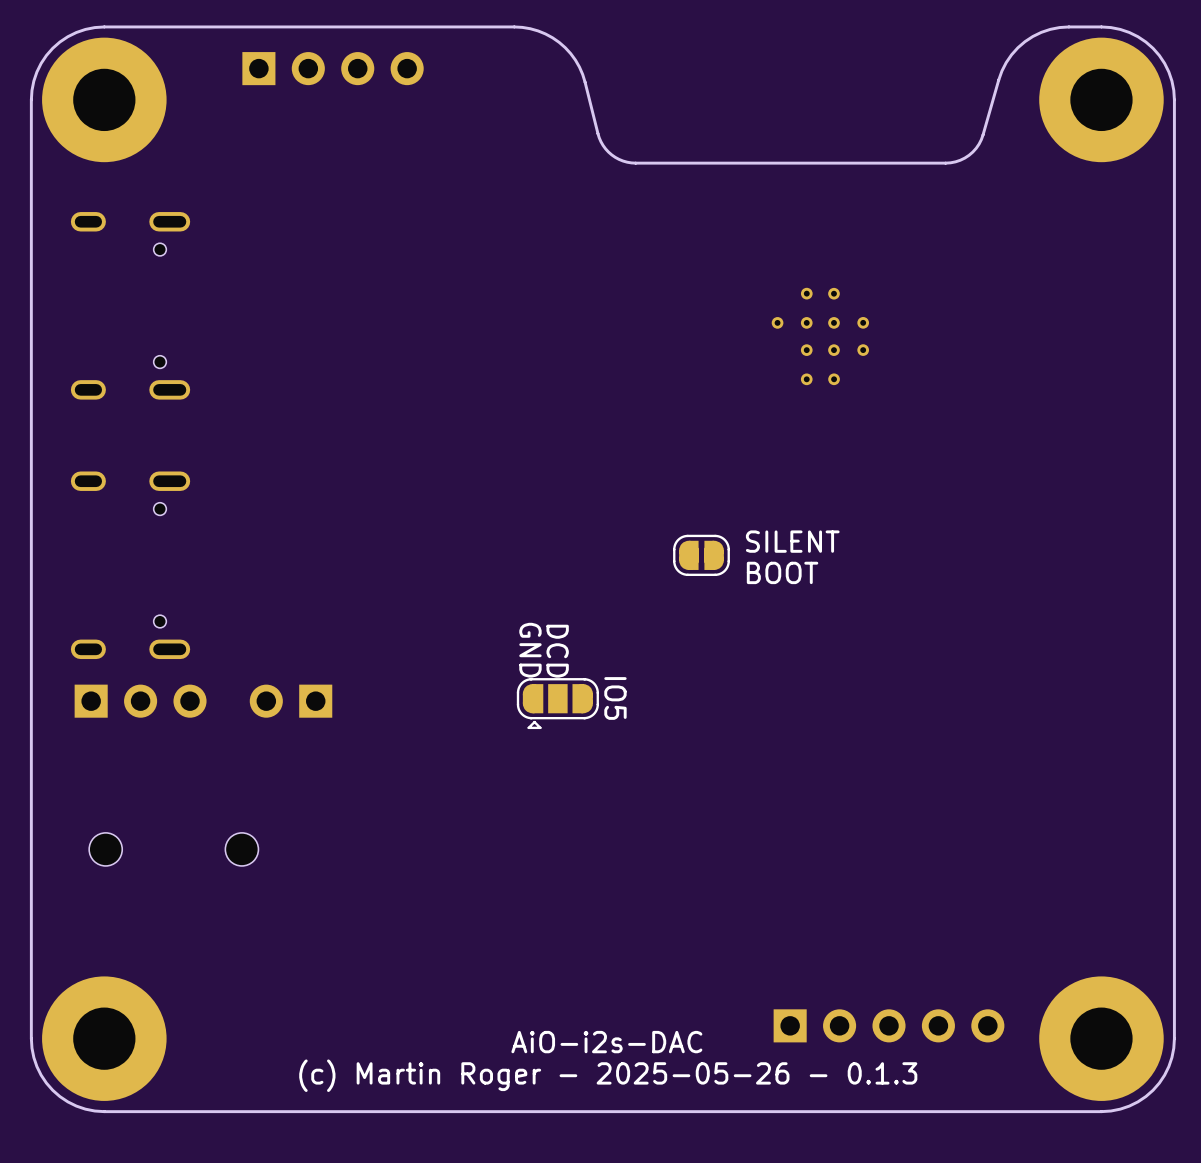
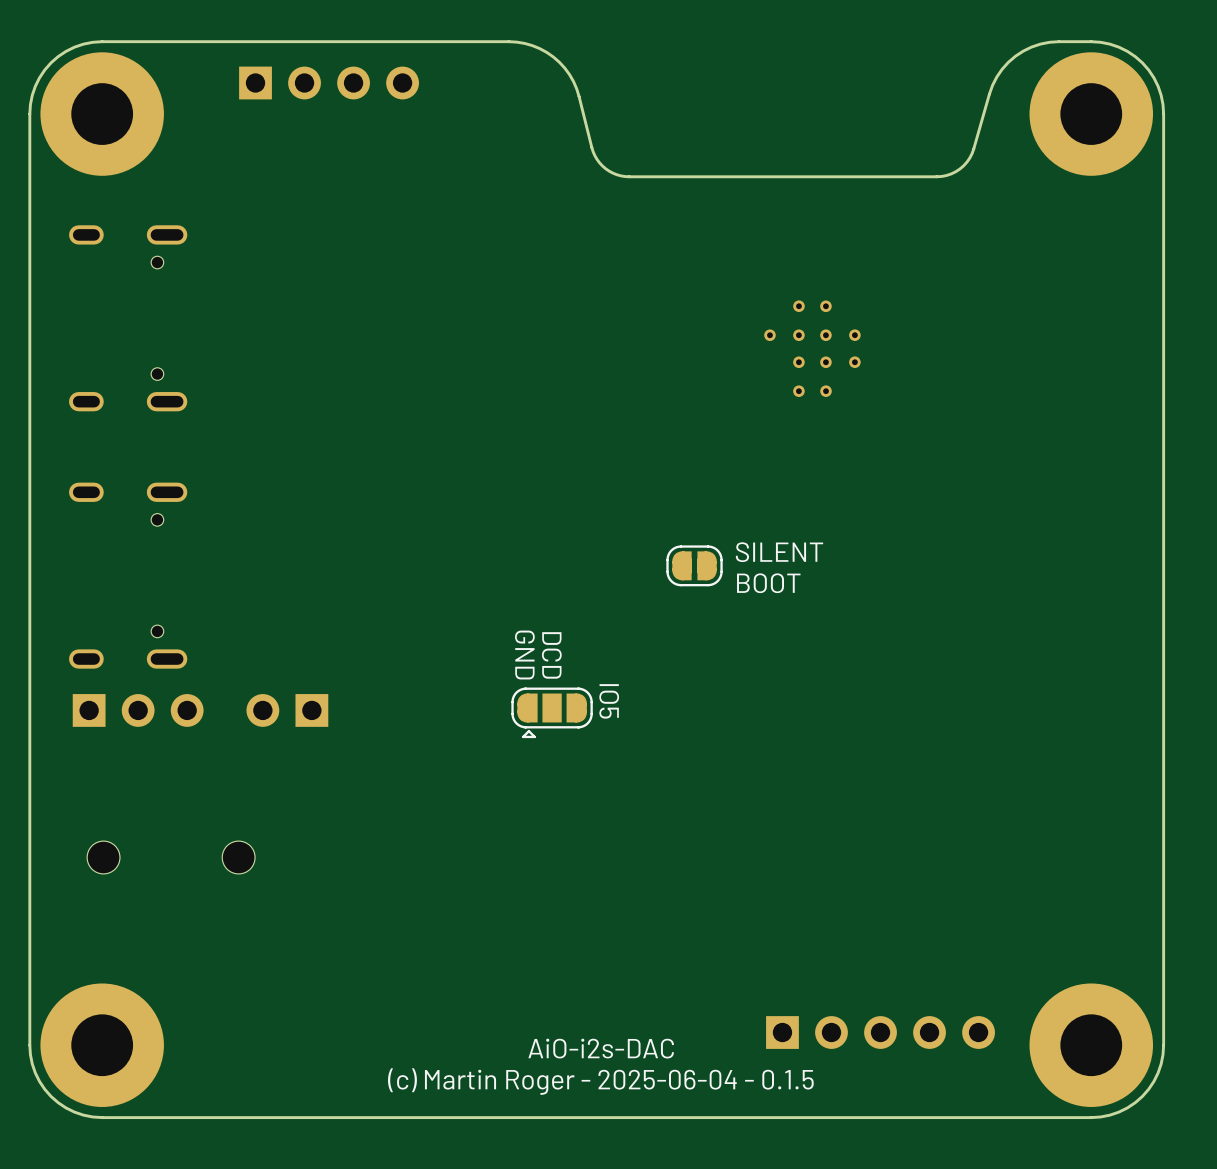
text: (c) Martin Roger - 2025-05-26 - 0.1.3 (608, 1075) -> (c) Martin Roger - 2025-06-04 - 0.1.5 (600, 1081)

